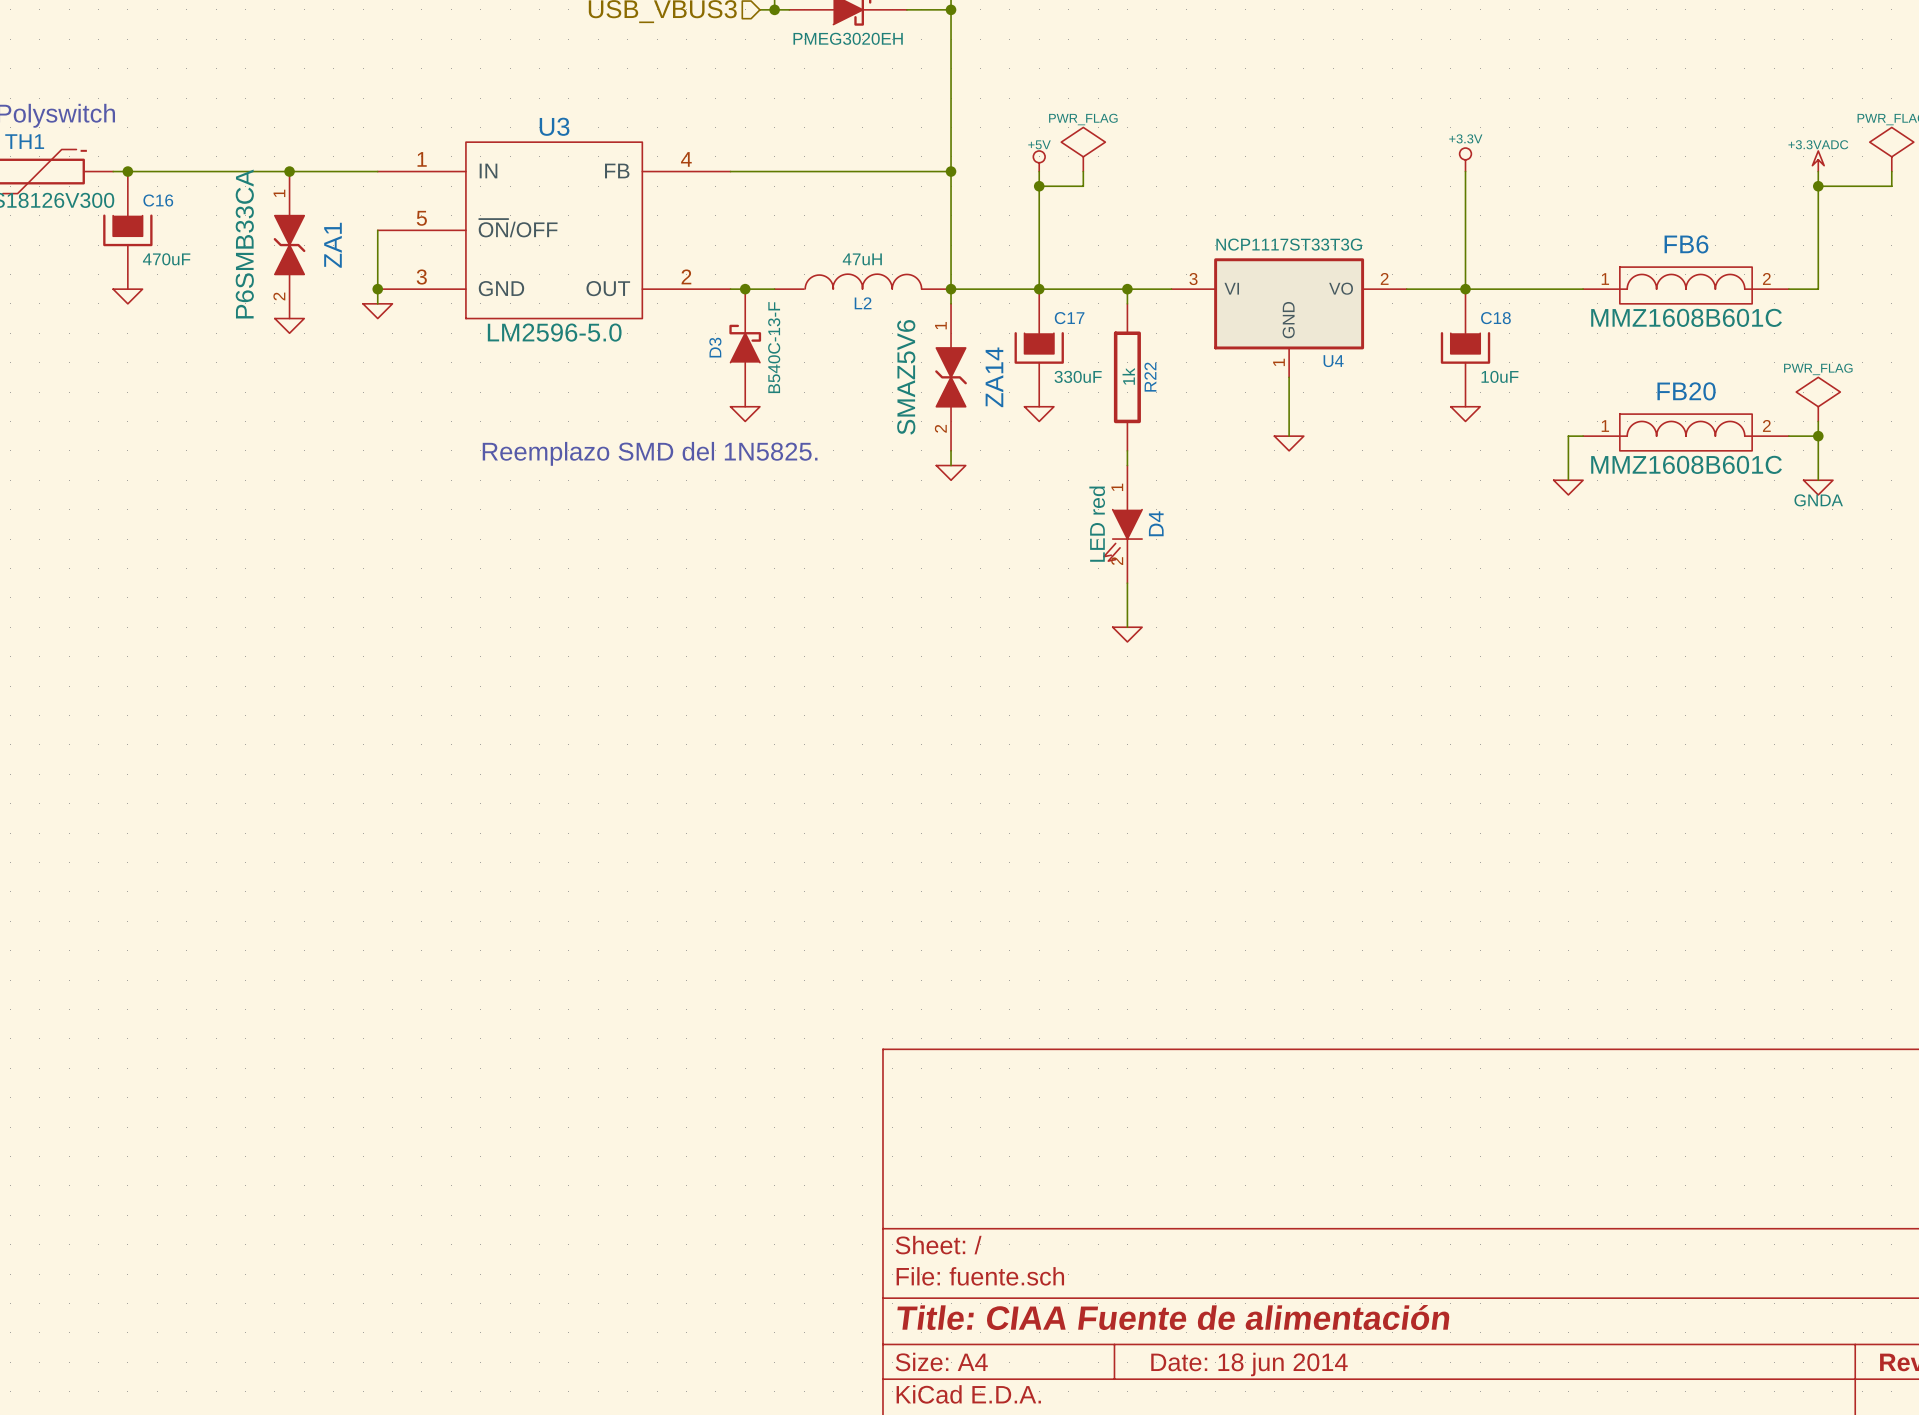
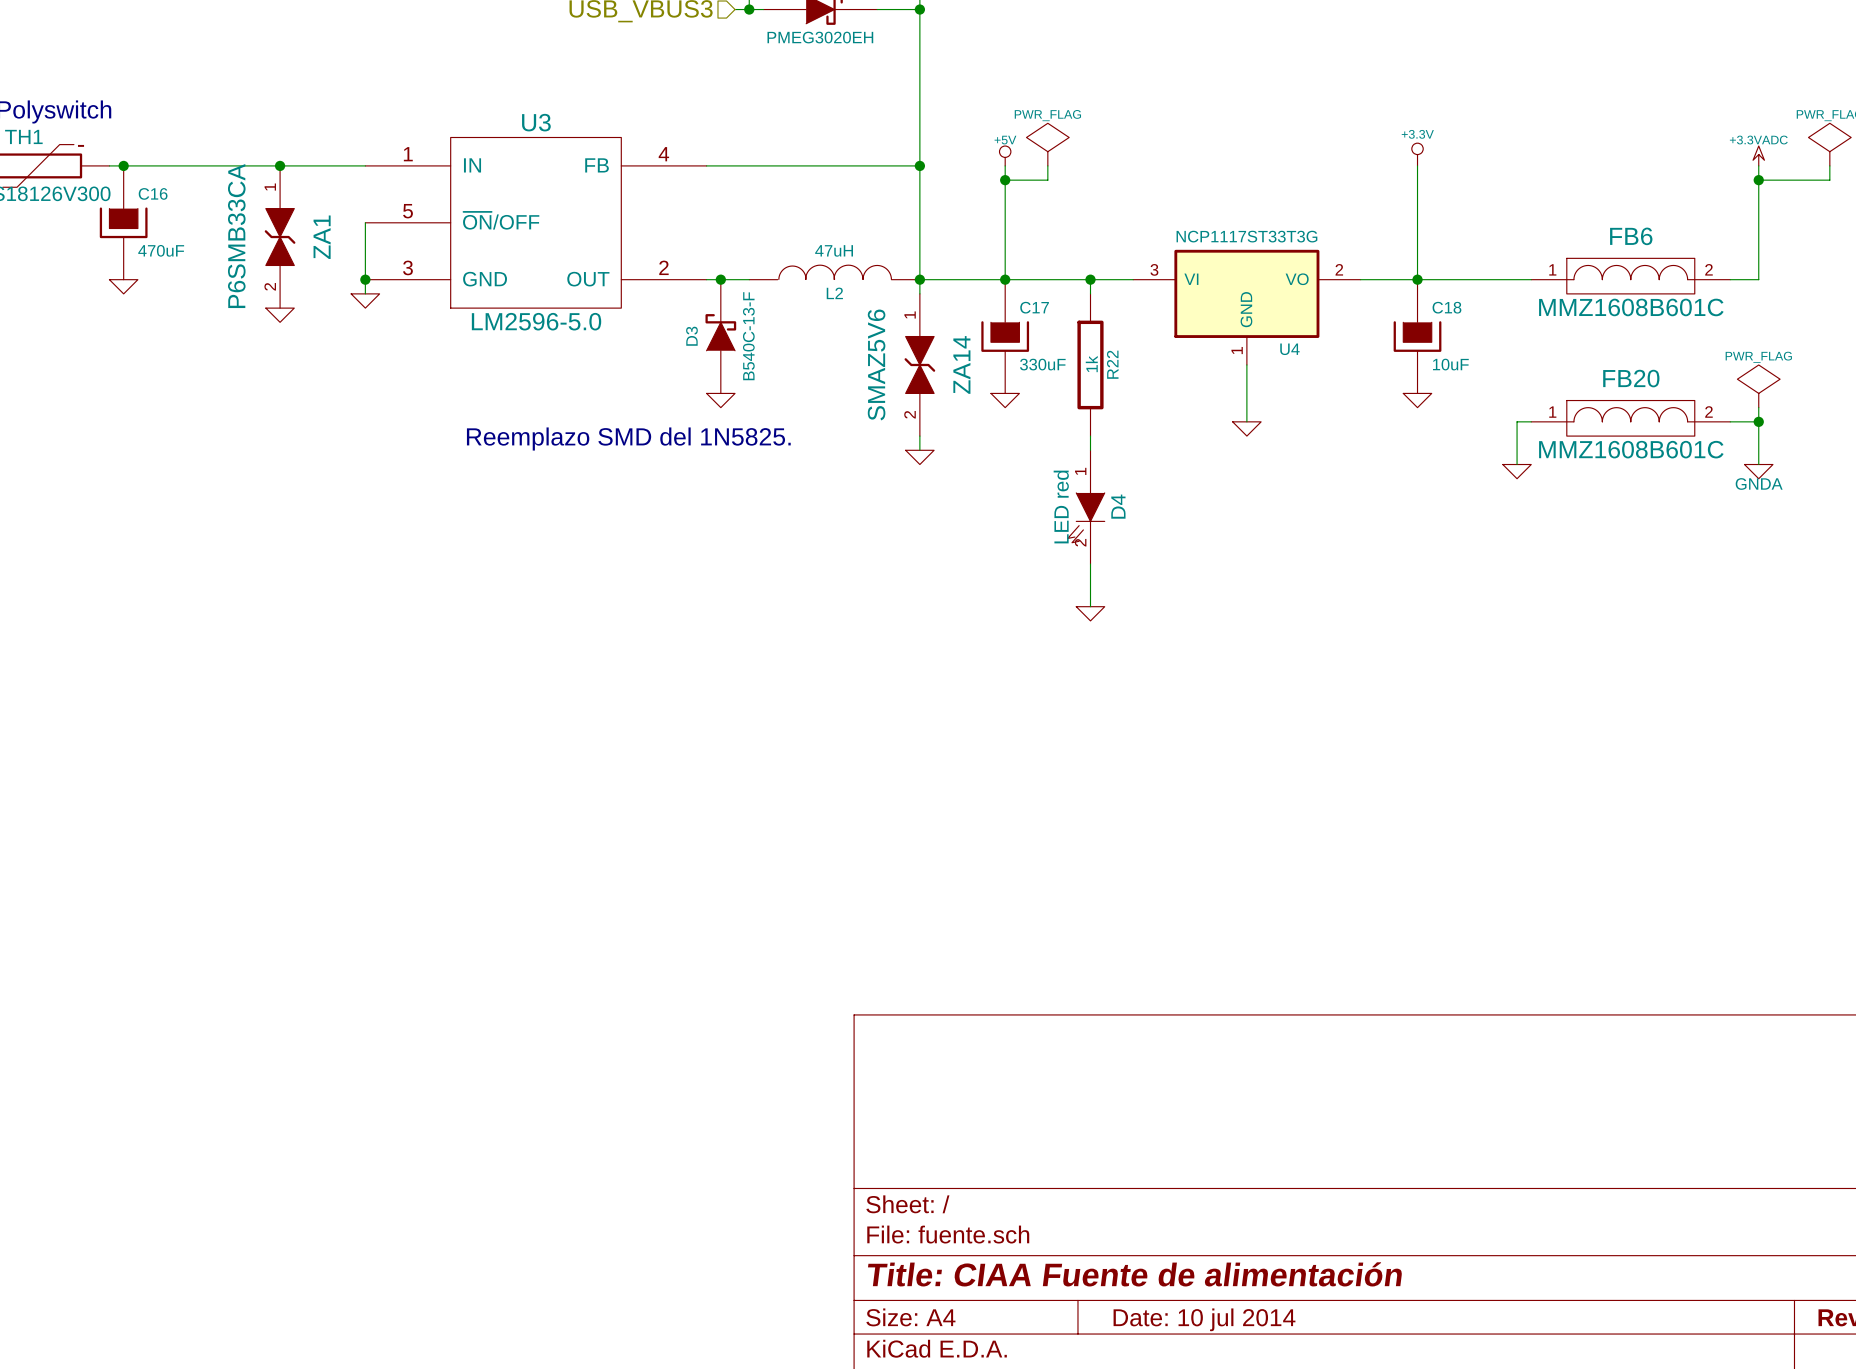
title block: Date: 18 jun 2014 (1249, 1364) -> Date: 10 jul 2014 (1204, 1319)

